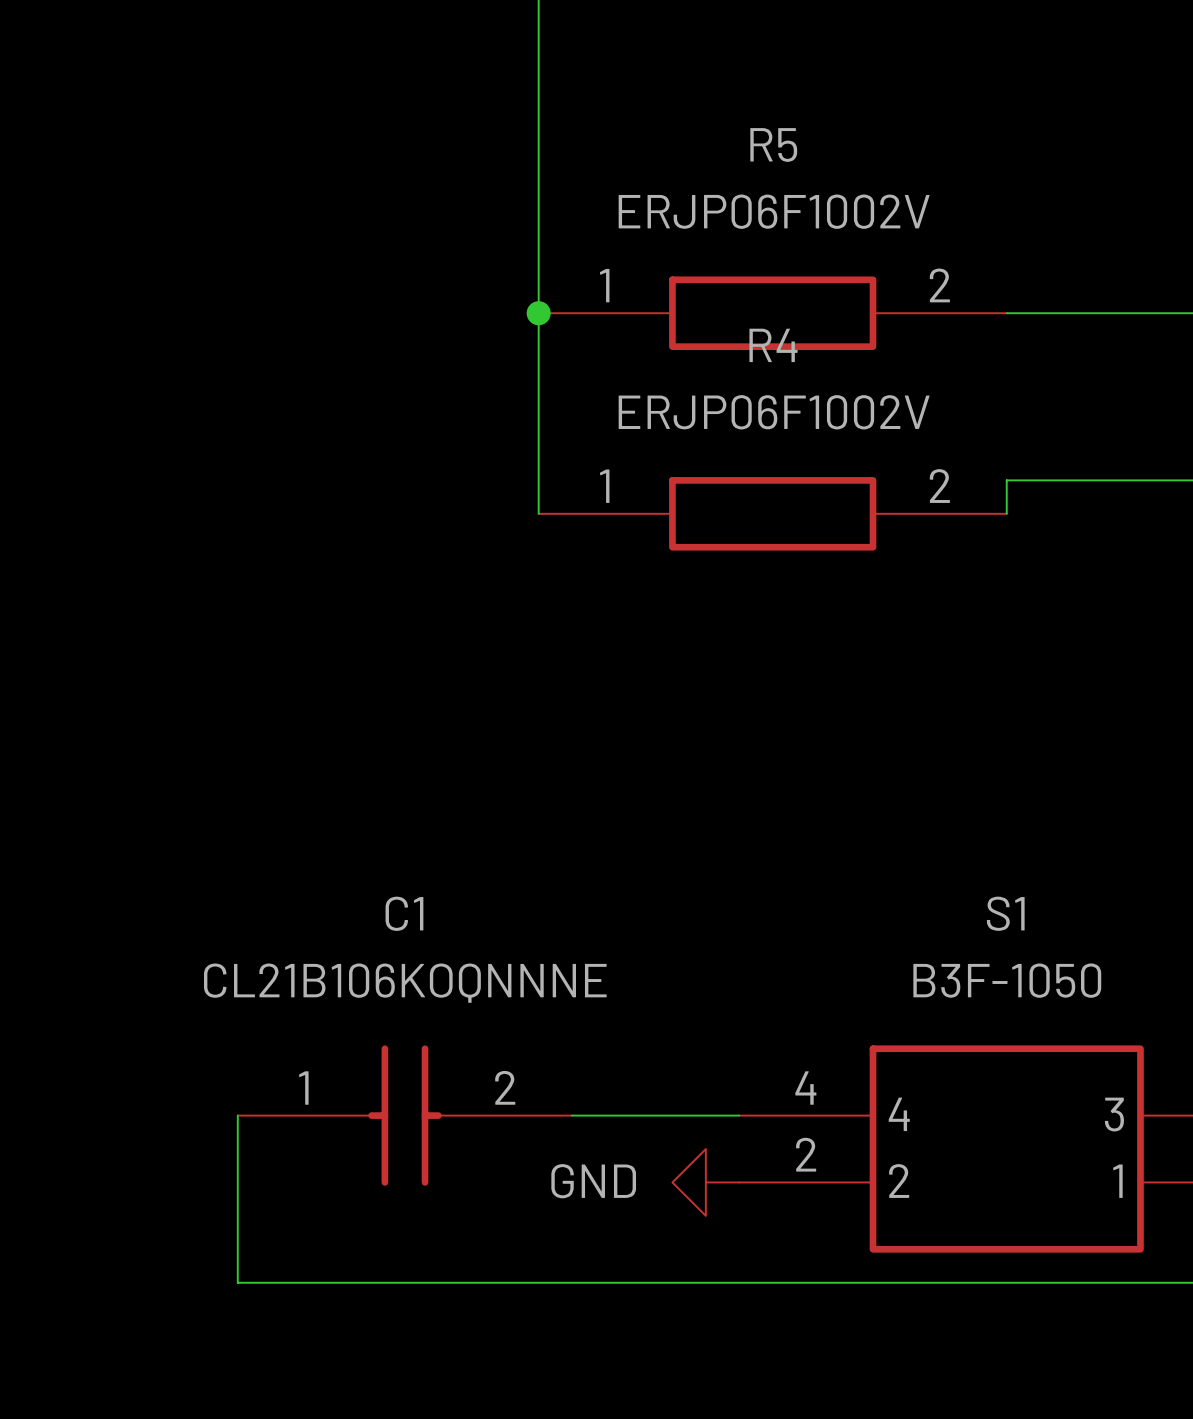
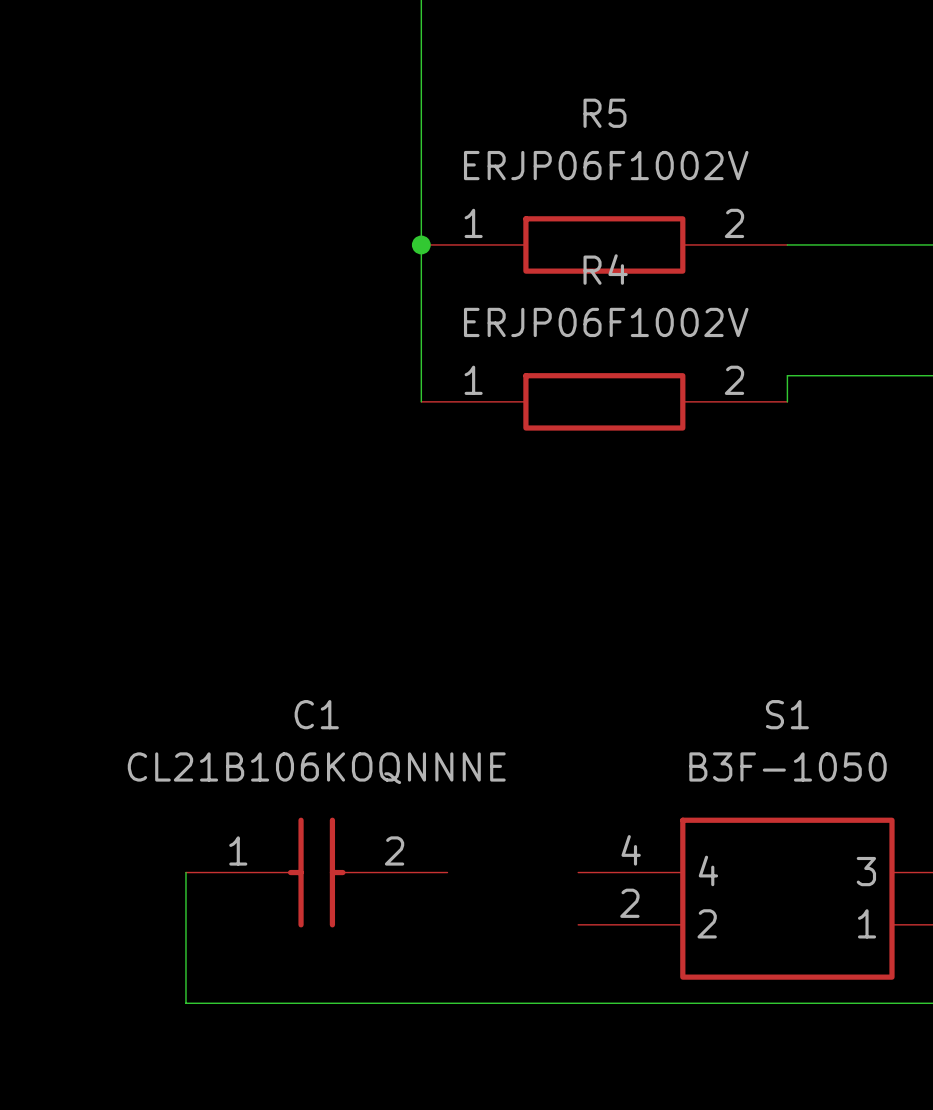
wire: (572, 1115) (739, 1115) -> none
power symbol: GND (705, 1182) -> none

